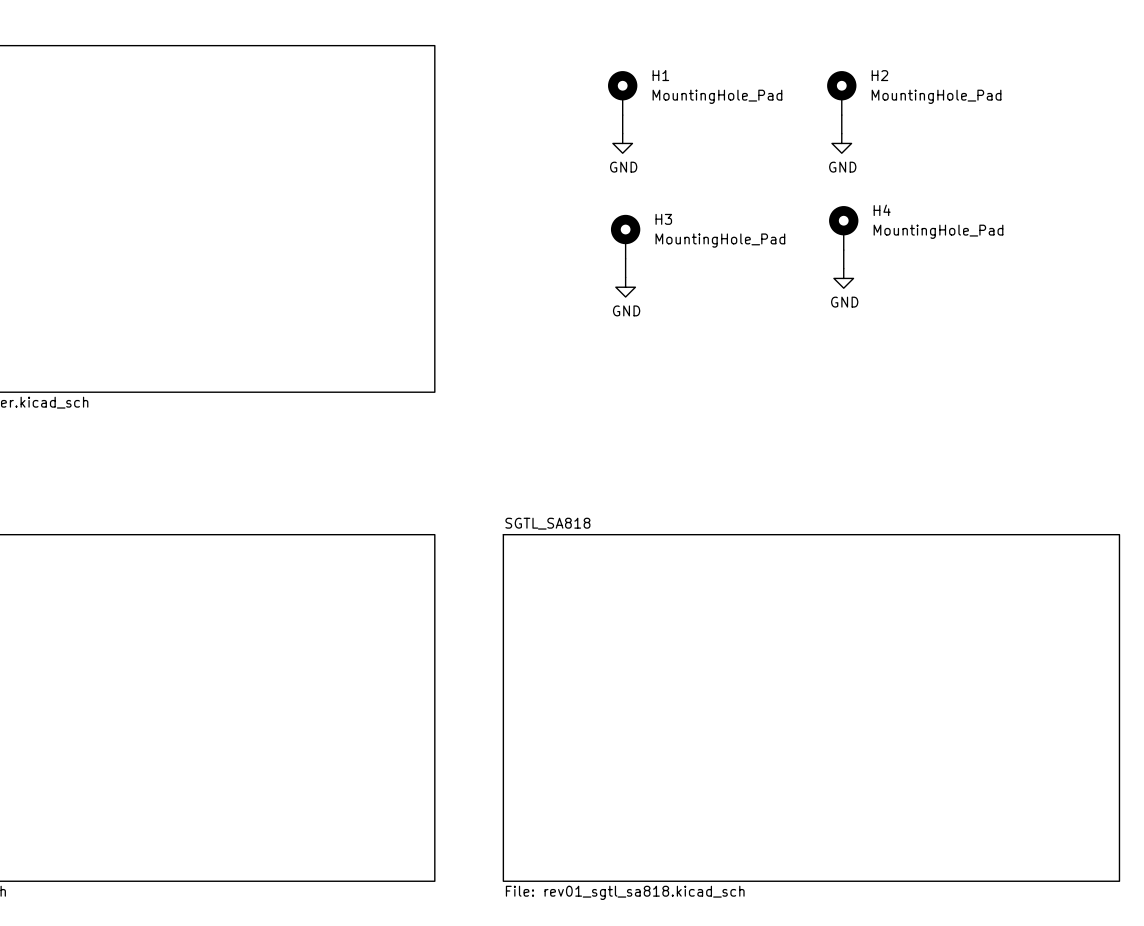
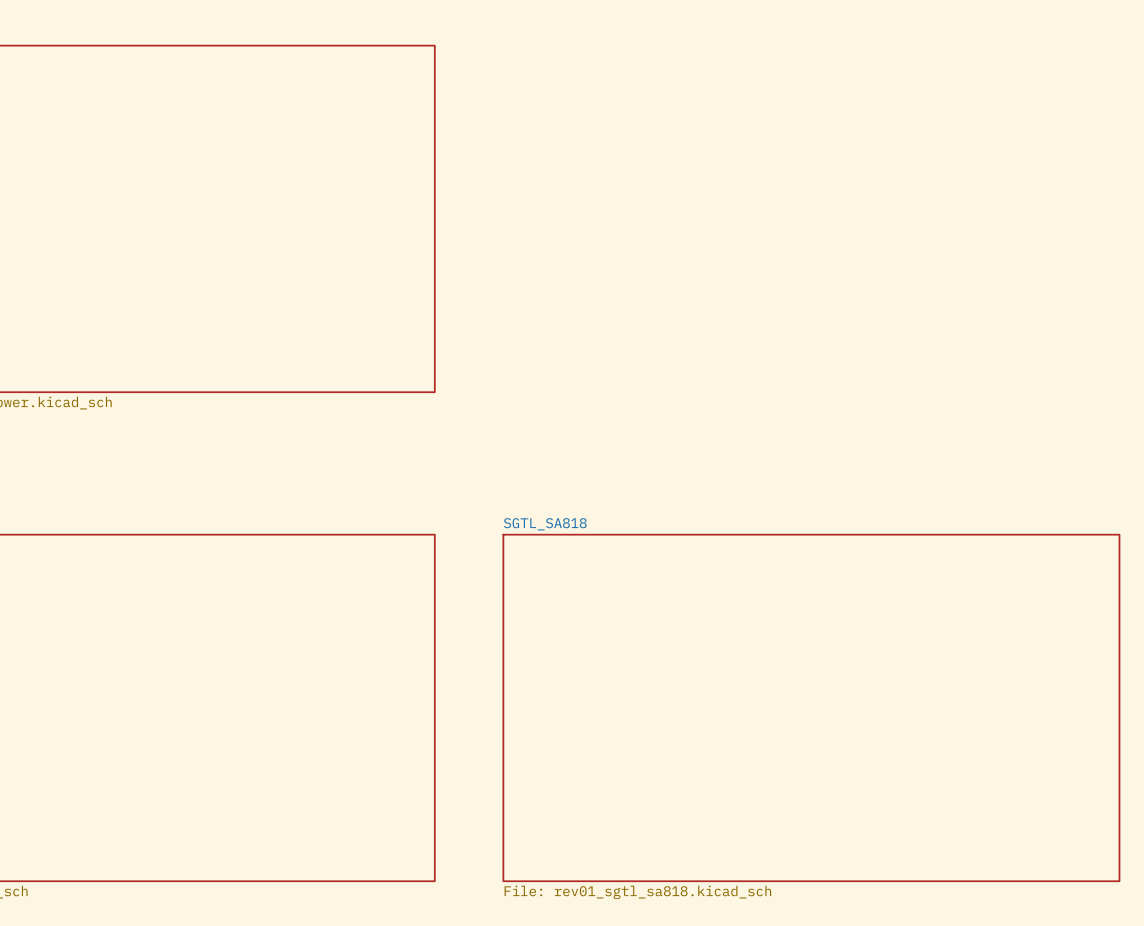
H1: MountingHole_Pad (622, 93) -> none
H2: MountingHole_Pad (841, 93) -> none
wire: (622, 115) (622, 133) -> none
wire: (841, 115) (841, 133) -> none
power symbol: GND (622, 143) -> none
power symbol: GND (841, 143) -> none
H4: MountingHole_Pad (843, 228) -> none
H3: MountingHole_Pad (625, 236) -> none
wire: (843, 250) (843, 268) -> none
wire: (625, 258) (625, 277) -> none
power symbol: GND (843, 278) -> none
power symbol: GND (625, 287) -> none

